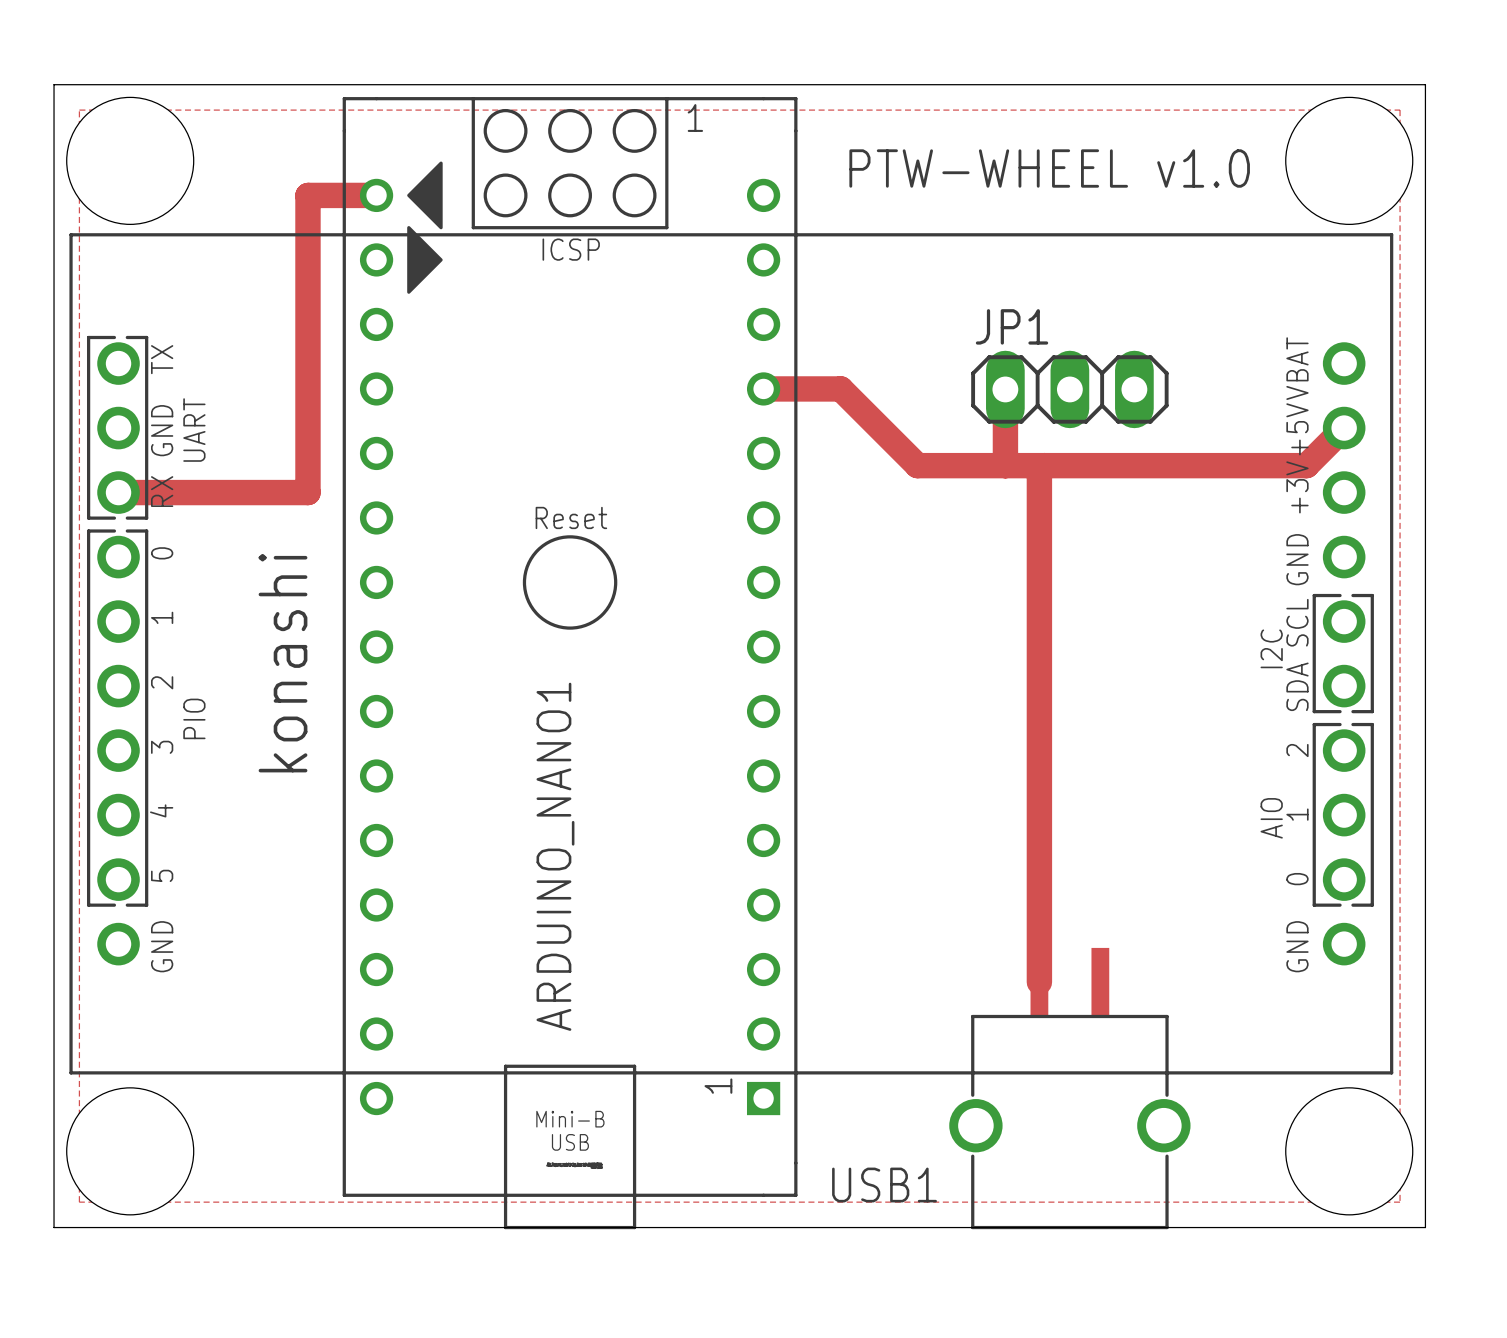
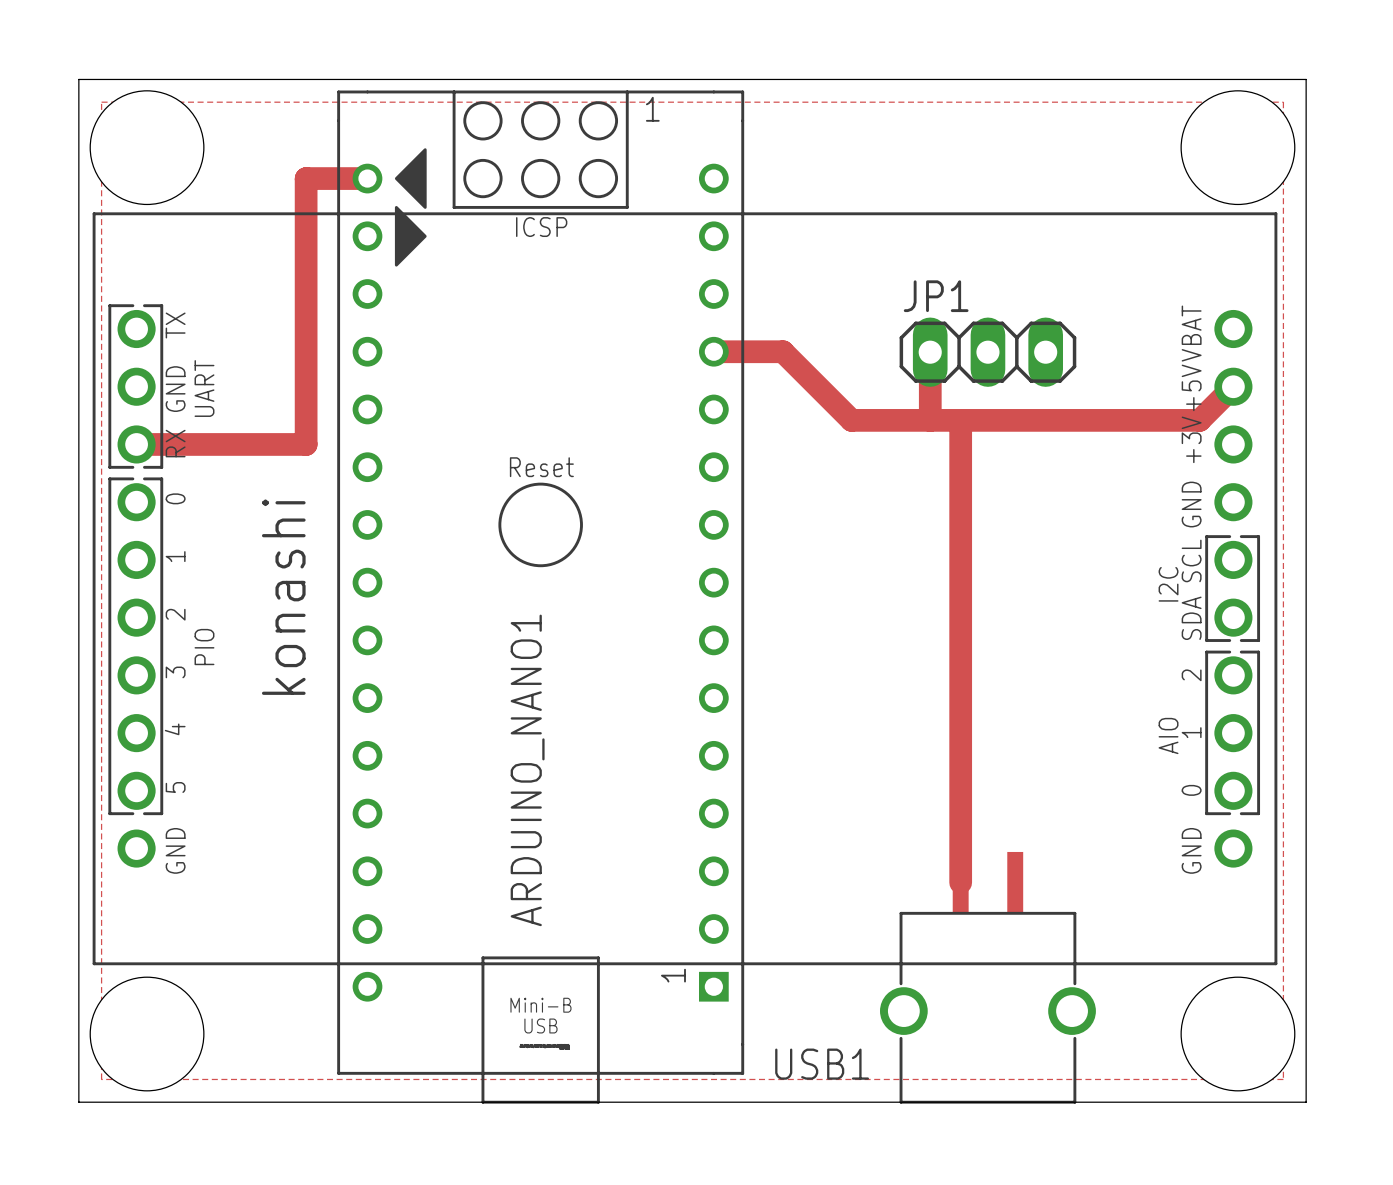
text: PTW-WHEEL v1.0 (1049, 168) -> none

